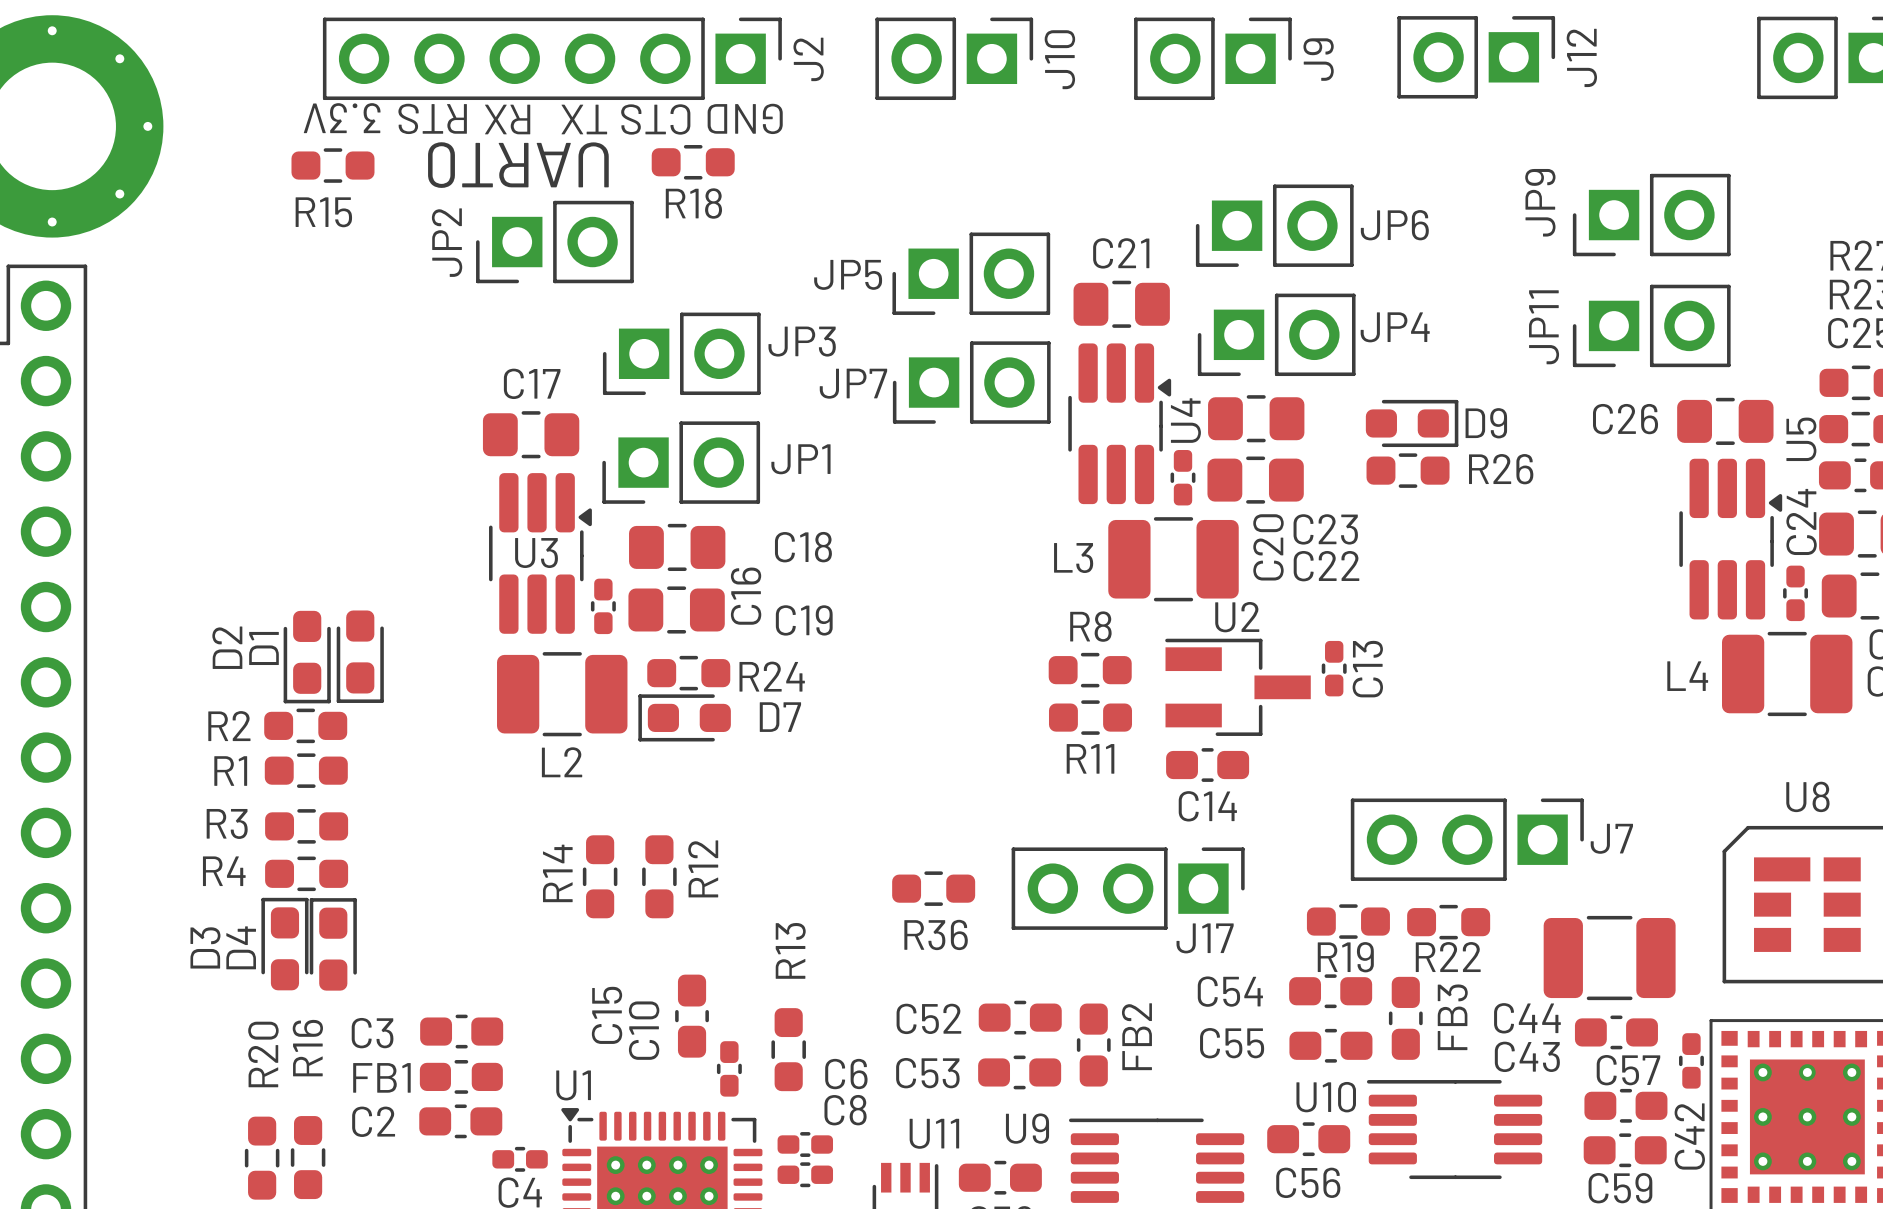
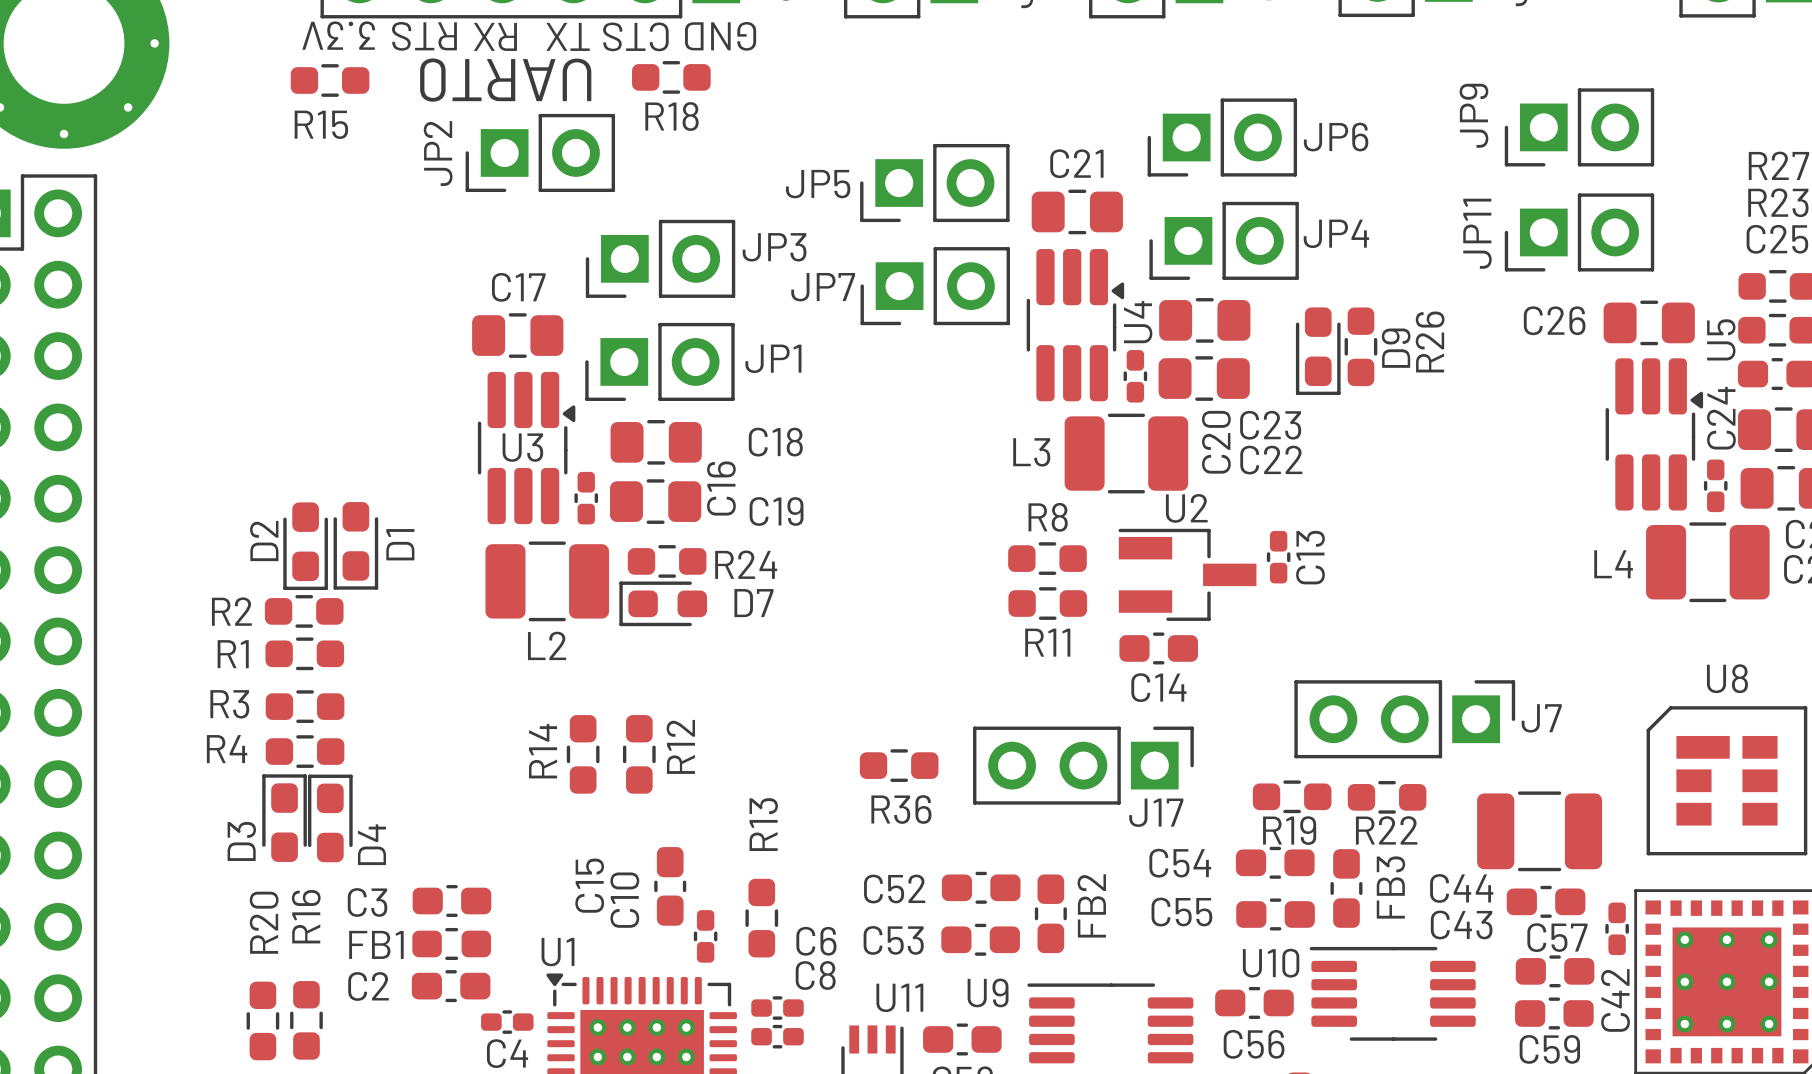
D9 rotation: 0° (1412, 423) -> 90° clockwise (1318, 351)
R26 rotation: 0° (1408, 470) -> 90° clockwise (1360, 346)
D2 name position: D2 (227, 647) -> D2 (264, 541)
D1 name position: D1 (263, 648) -> D1 (400, 544)
D3 name position: D3 (205, 947) -> D3 (241, 841)
D4 name position: D4 (241, 947) -> D4 (371, 844)

